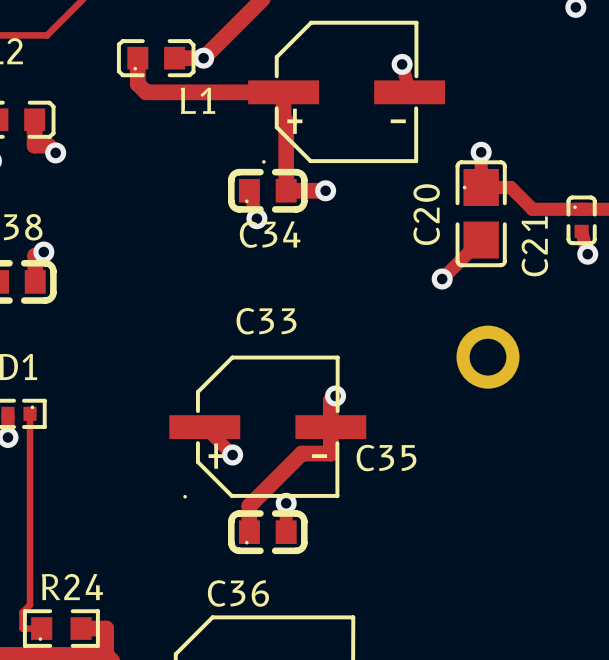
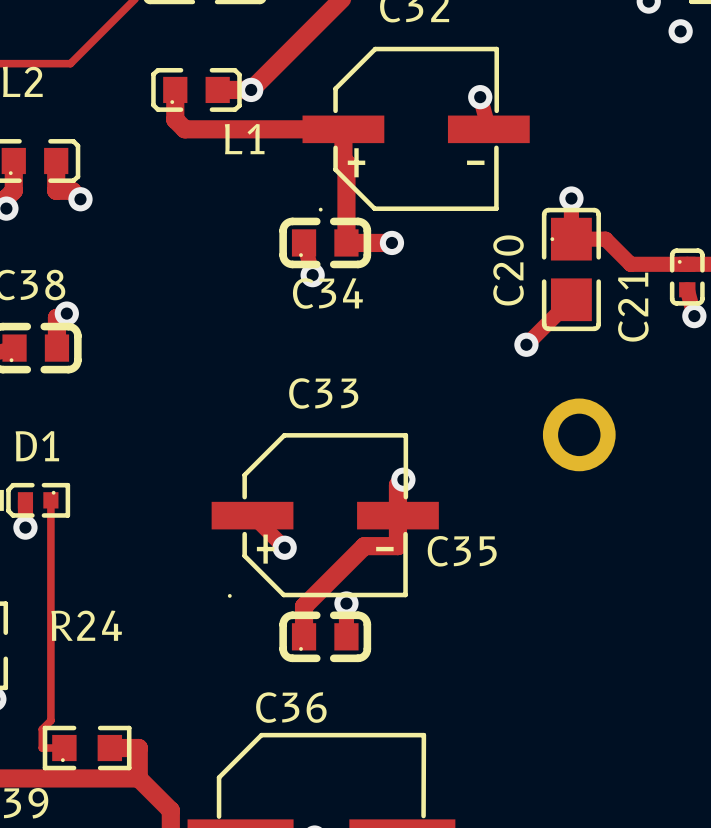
R24 name position: R24 (72, 586) -> R24 (86, 625)

